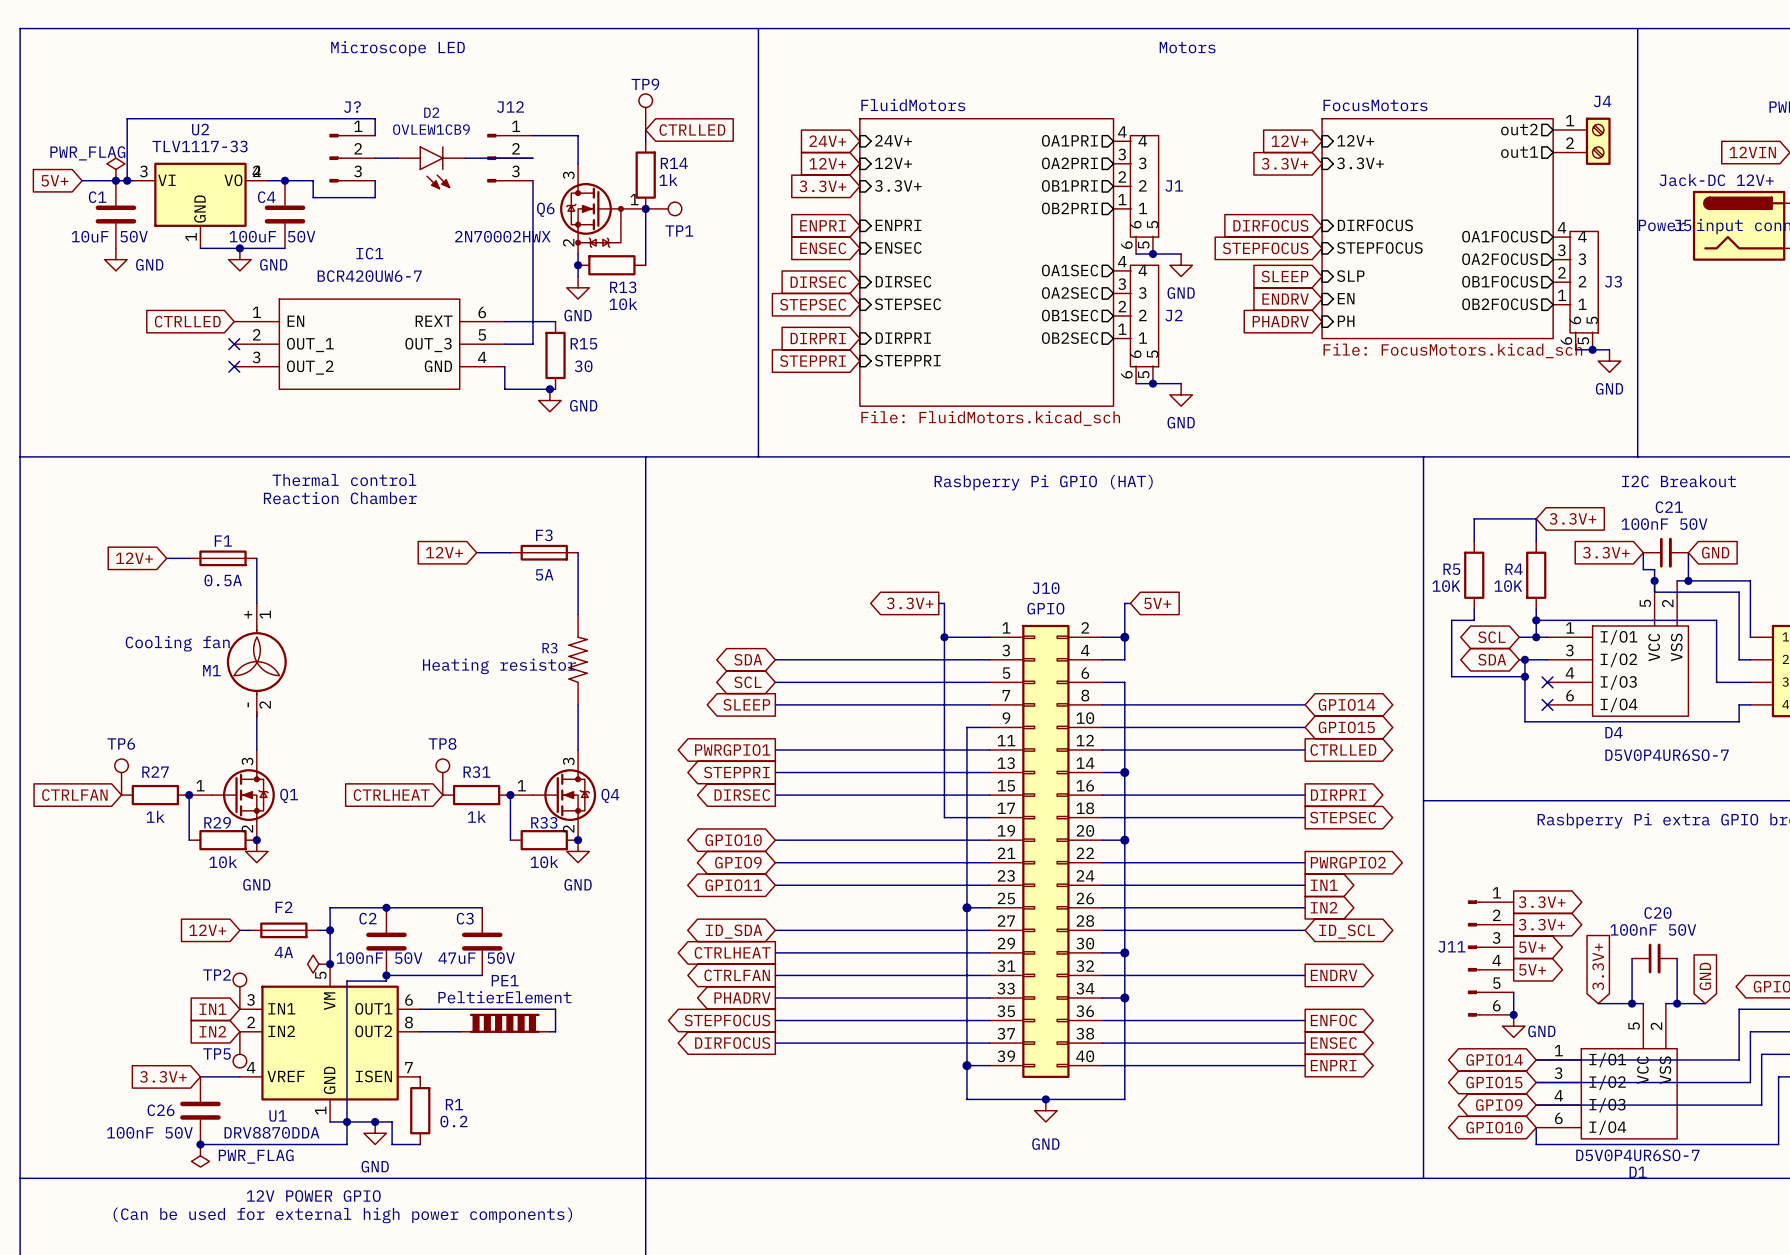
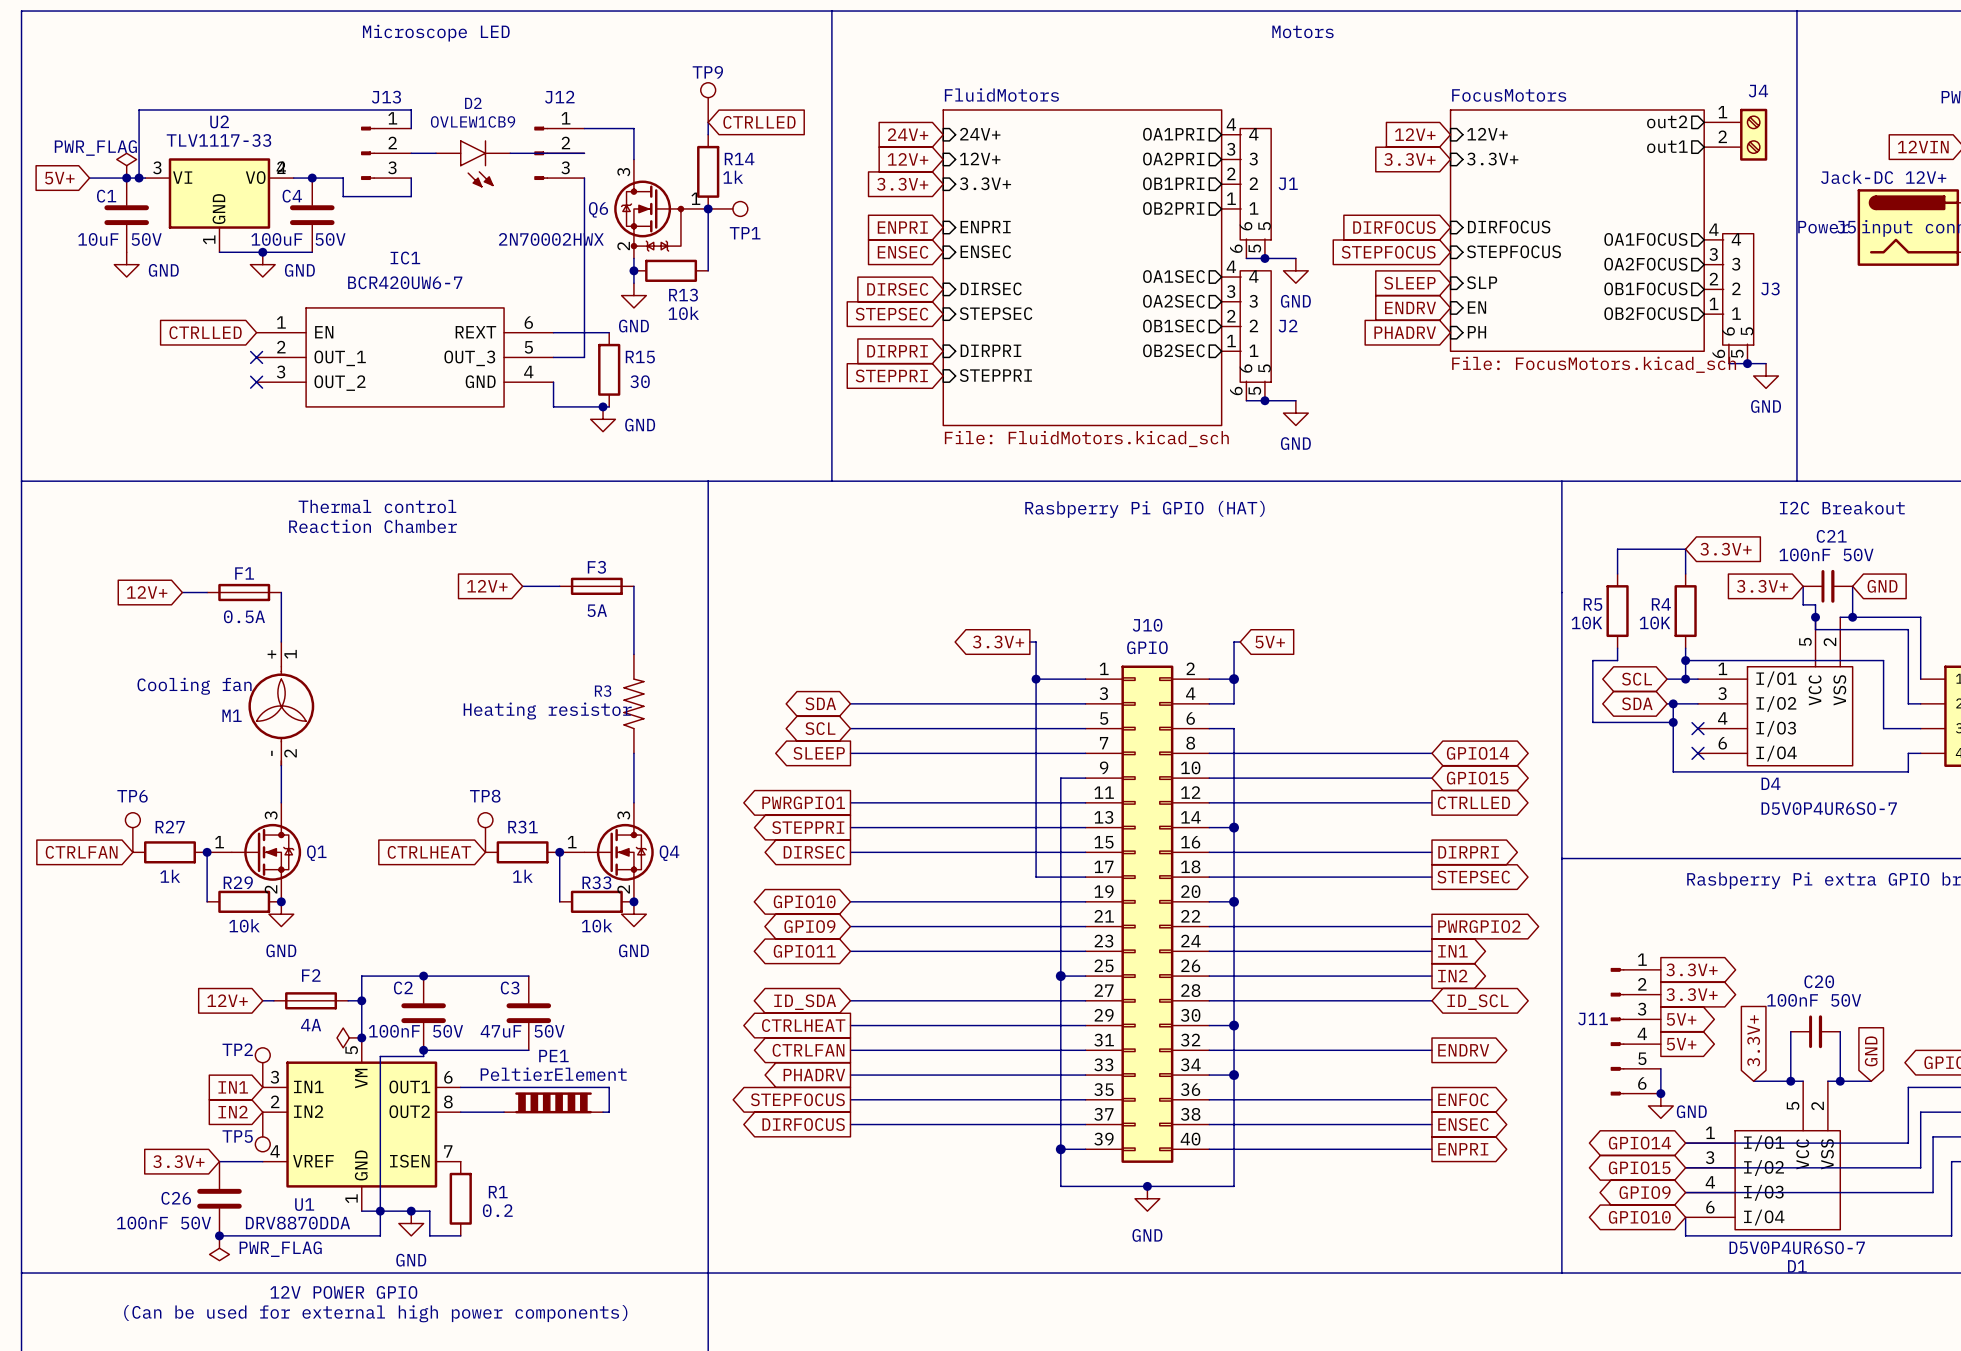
J? name: J? (352, 107) -> J13 (386, 97)

